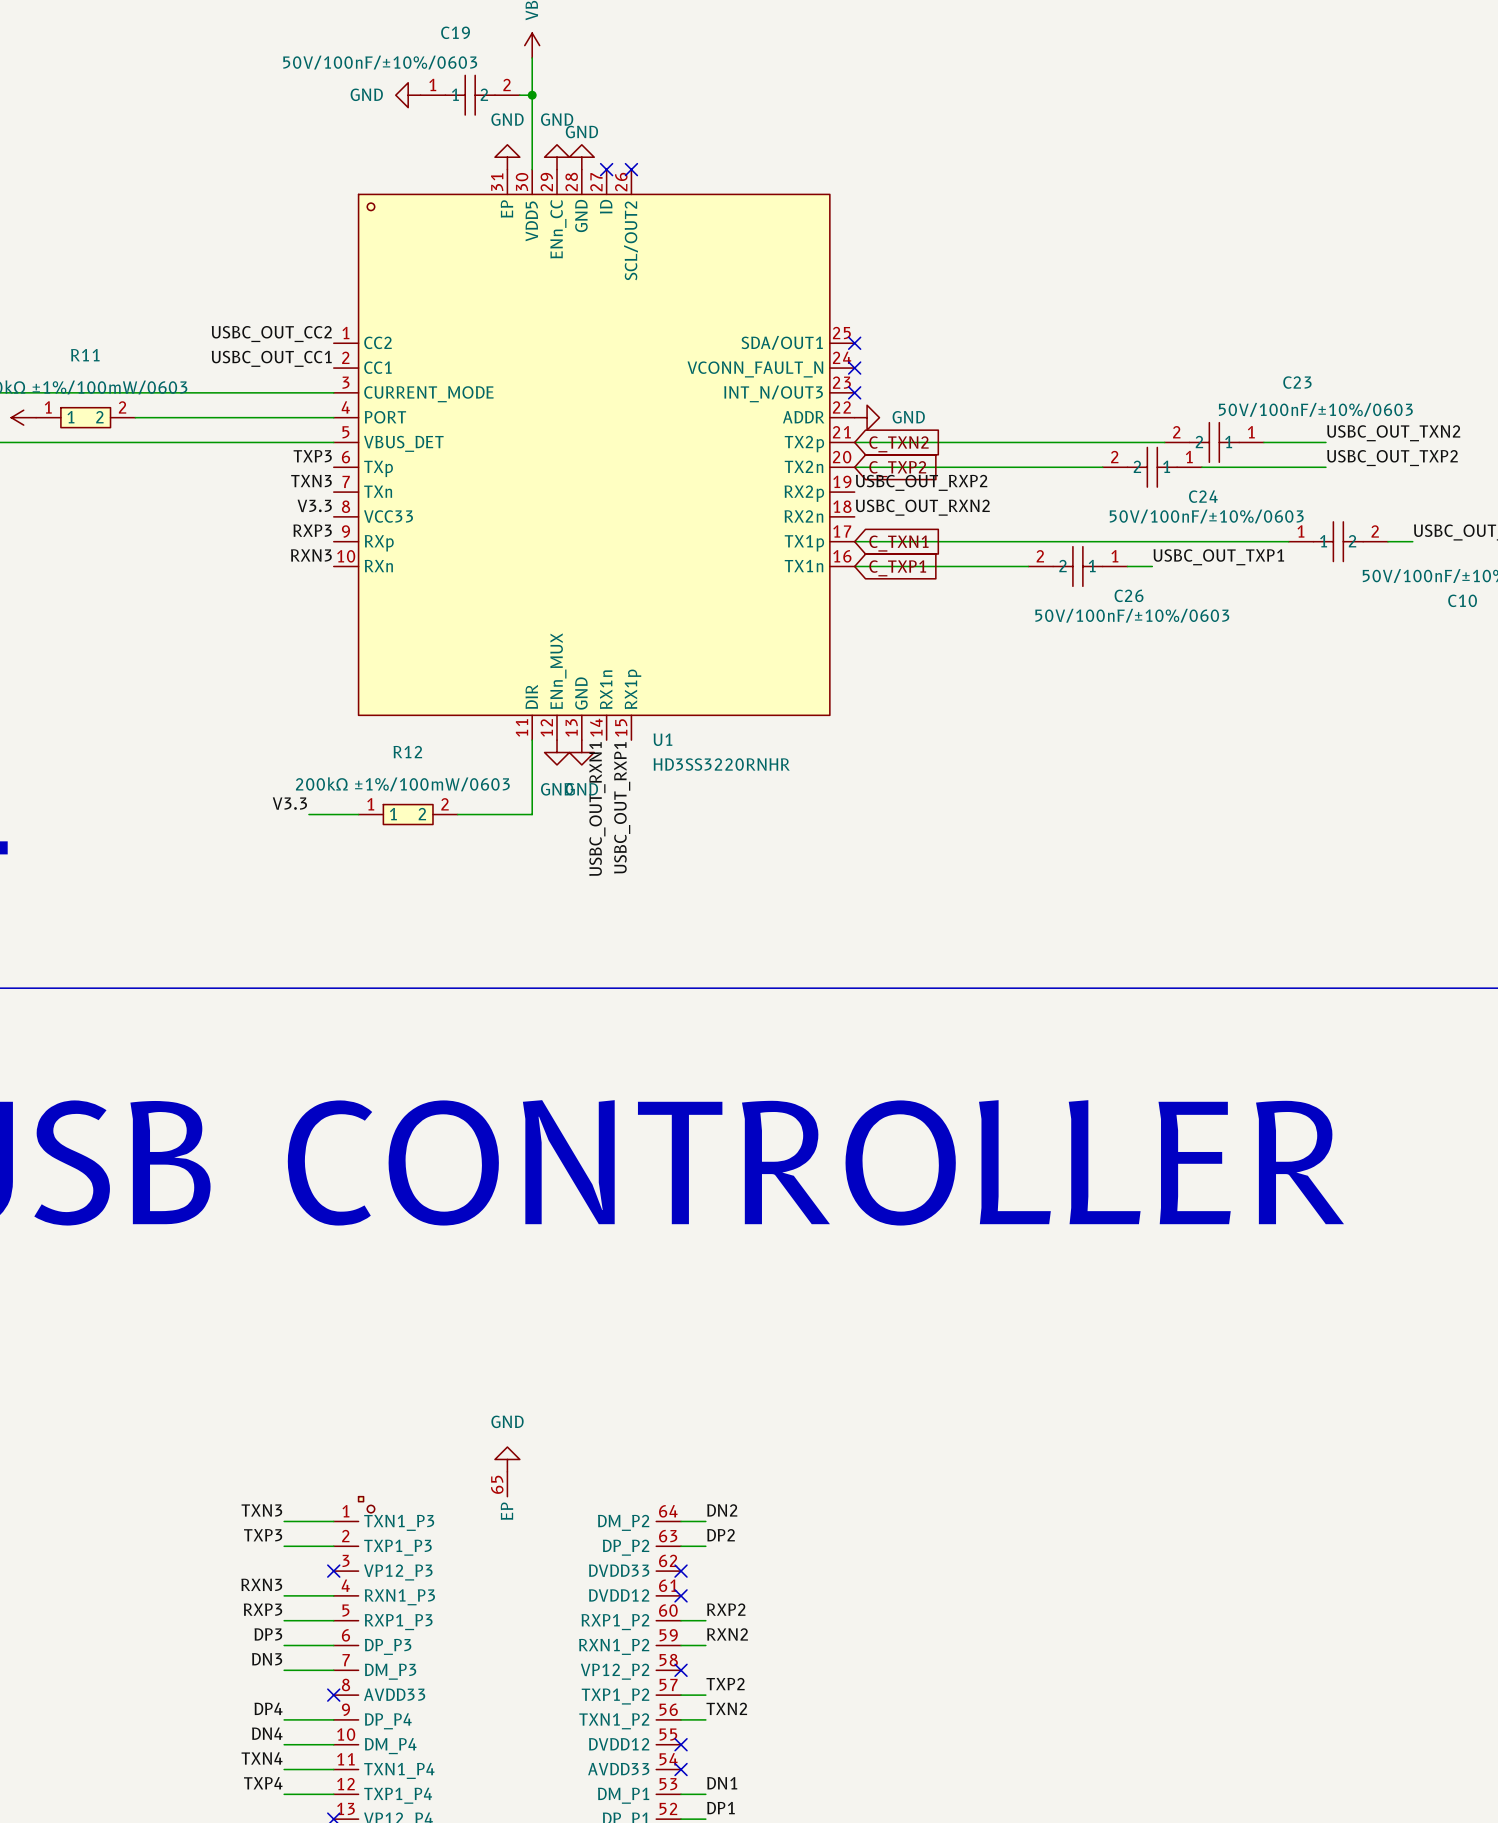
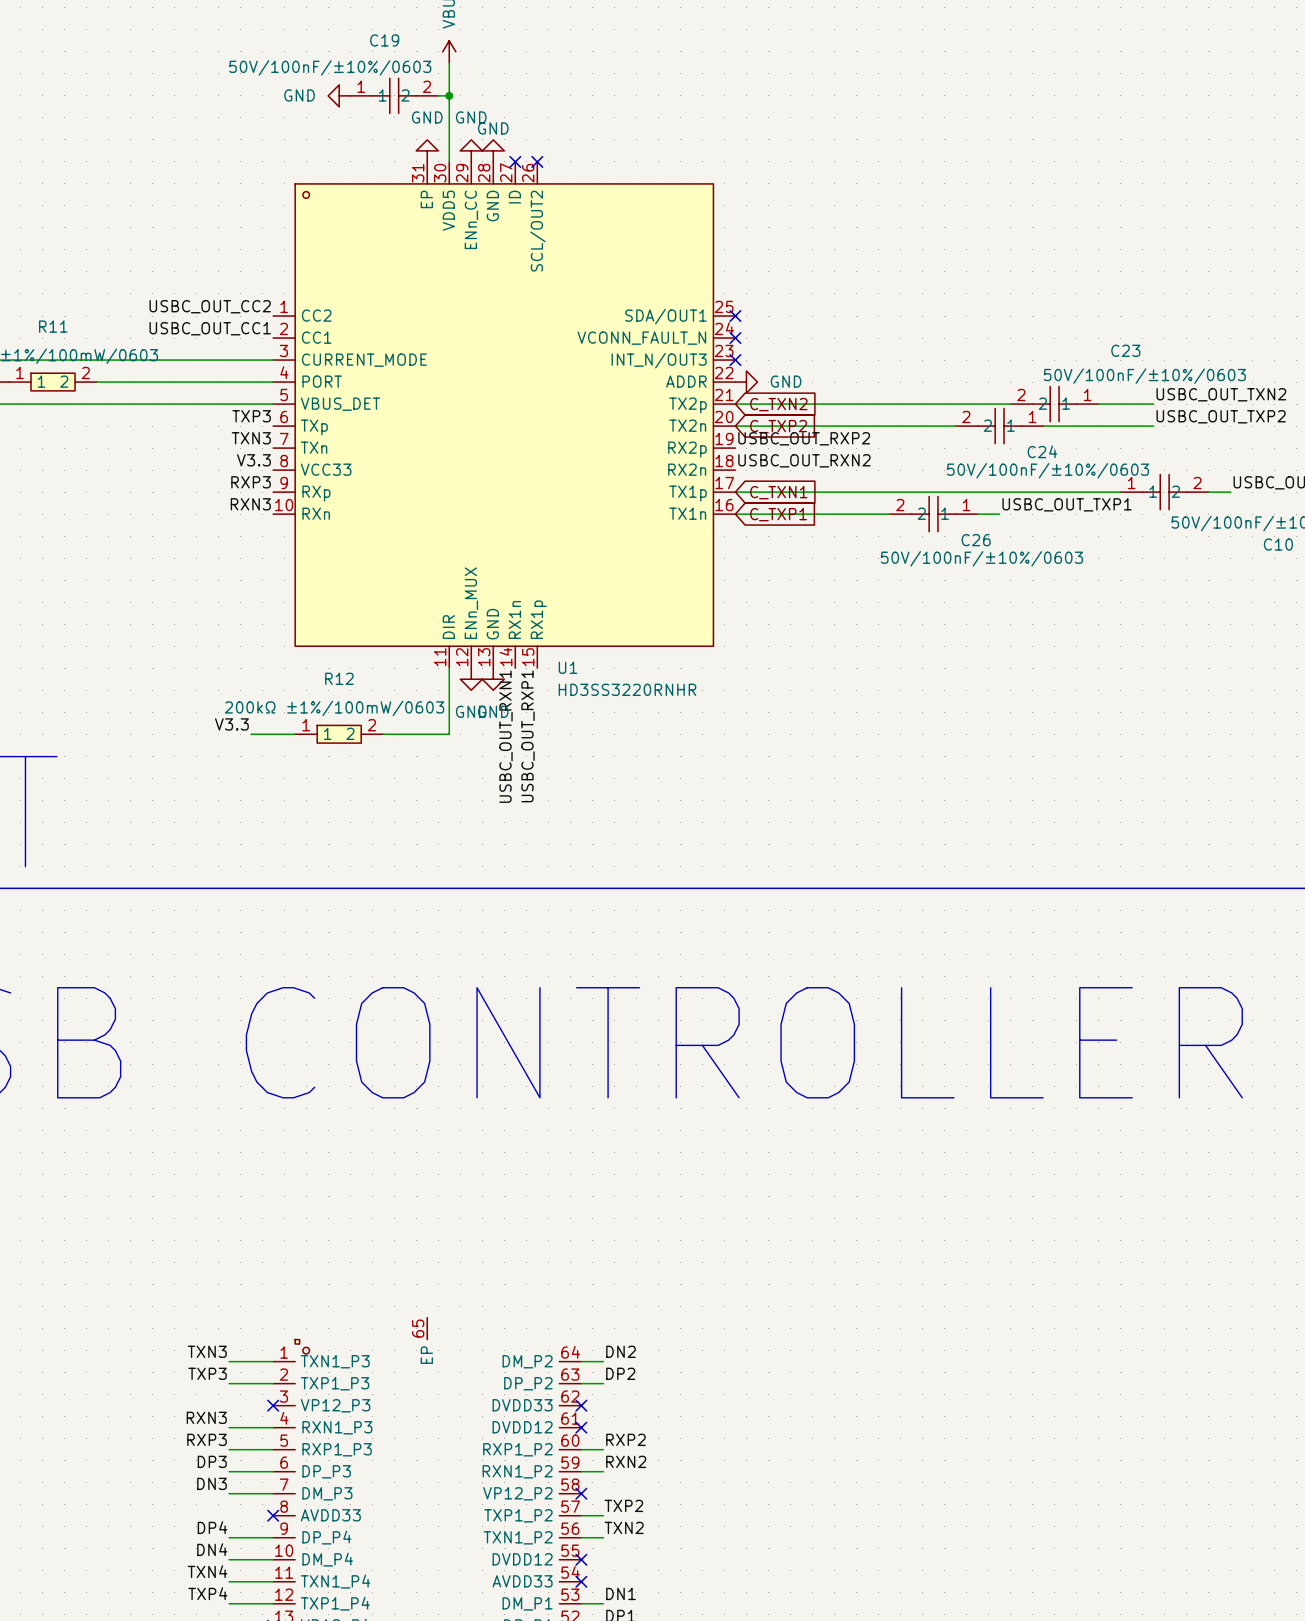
power symbol: GND (507, 1459) -> none

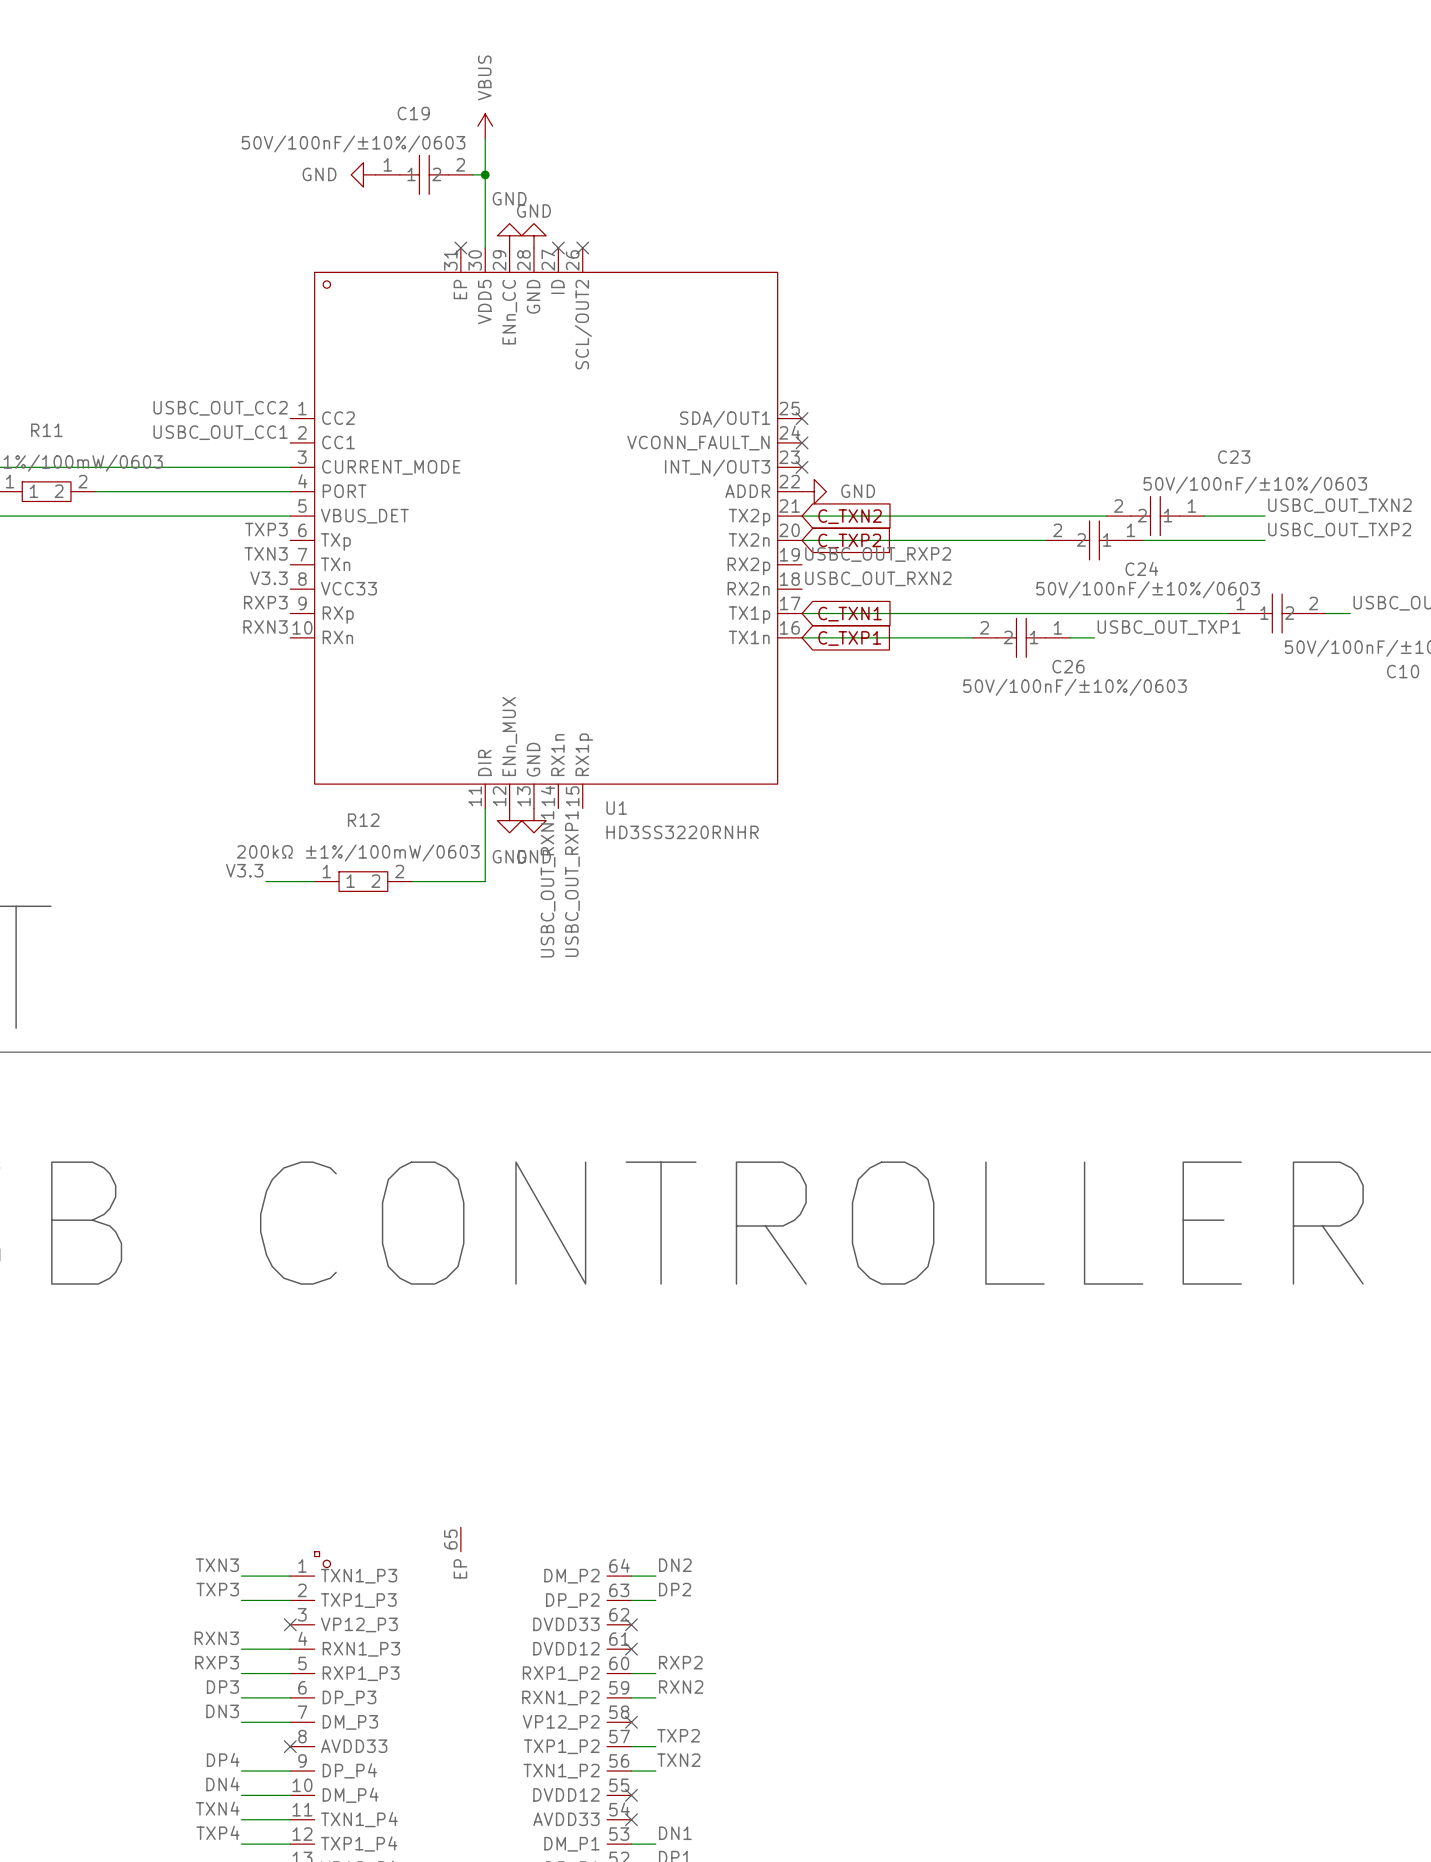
power symbol: GND (427, 150) -> none
no-connect mark: none -> (460, 248)

